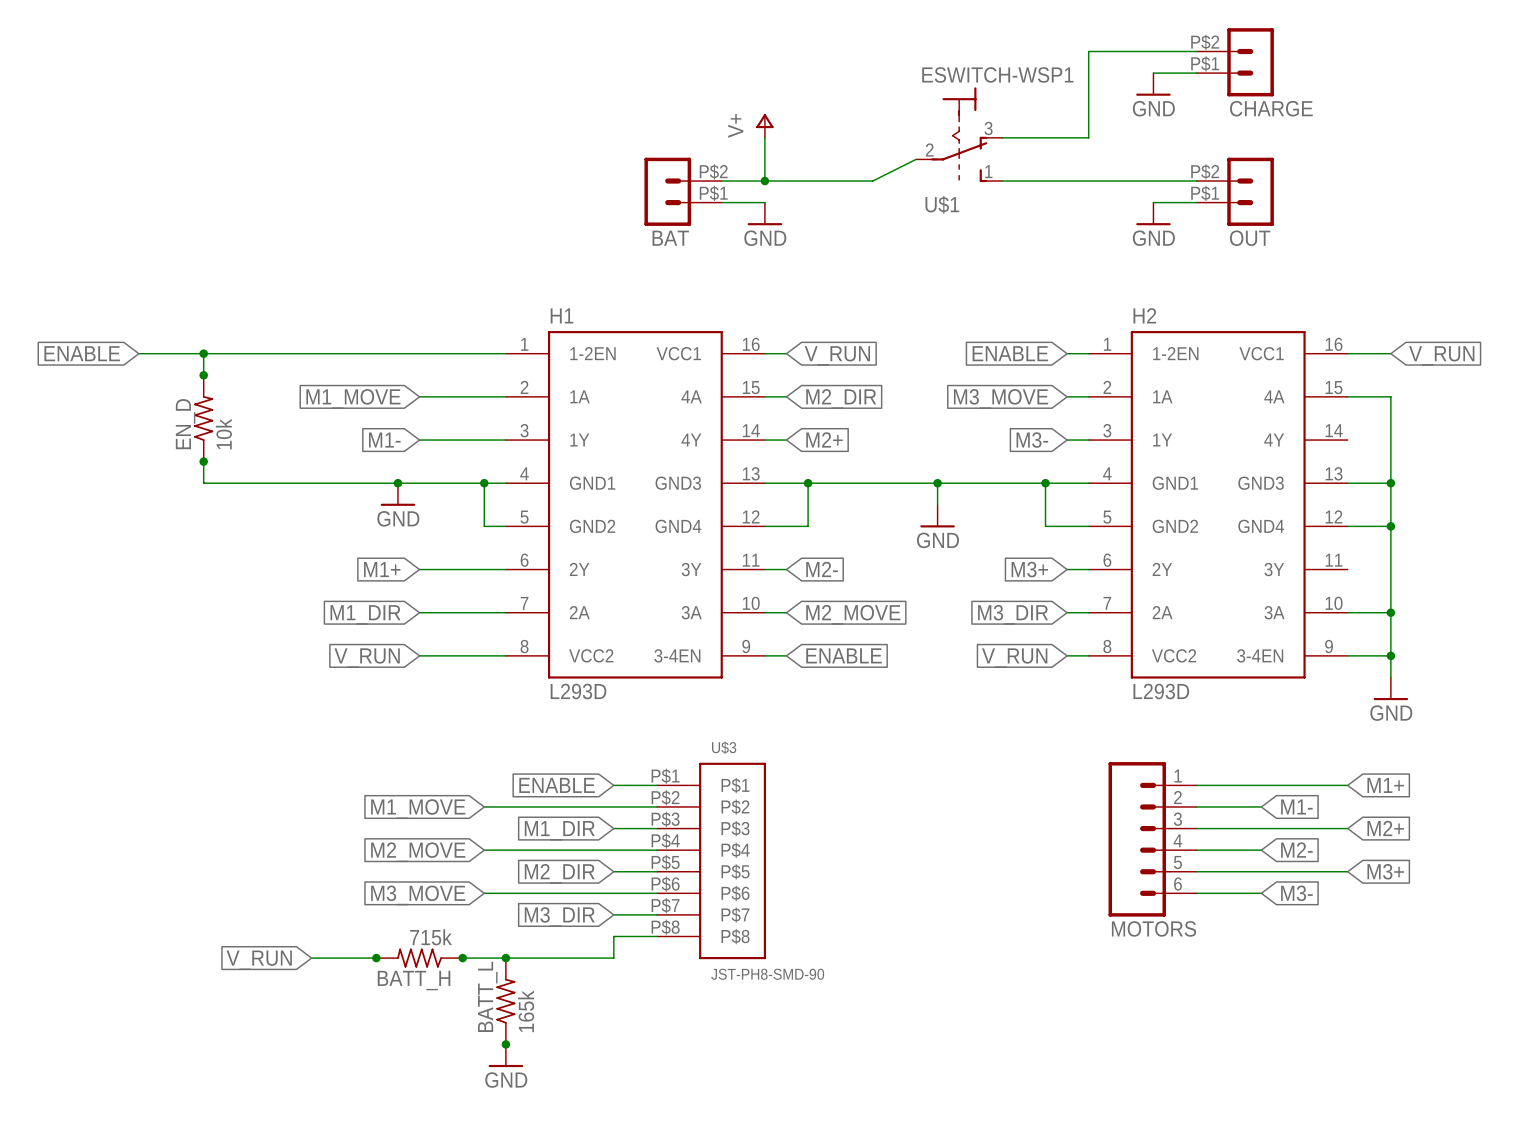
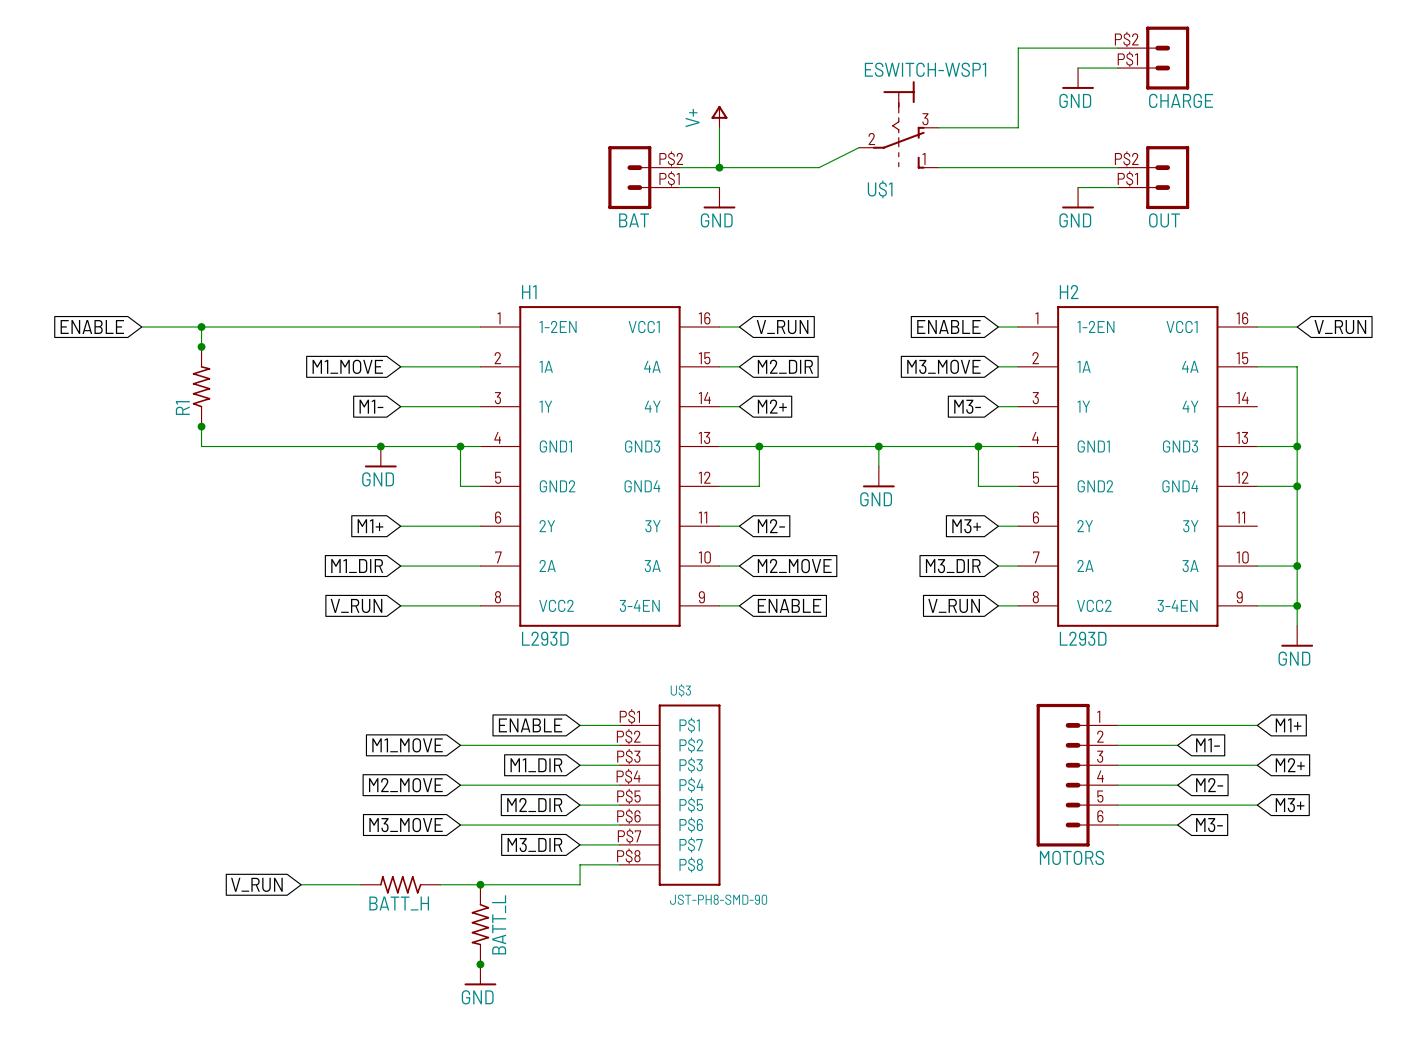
EN_D name: EN_D (185, 424) -> R1 (182, 408)
EN_D value: 10k (223, 434) -> none
BATT_H value: 715k (431, 937) -> none
junction: (376, 958) -> none
junction: (462, 958) -> none
BATT_L rotation: 0° (505, 1001) -> 180° (480, 924)
BATT_L value: 165k (526, 1011) -> none

